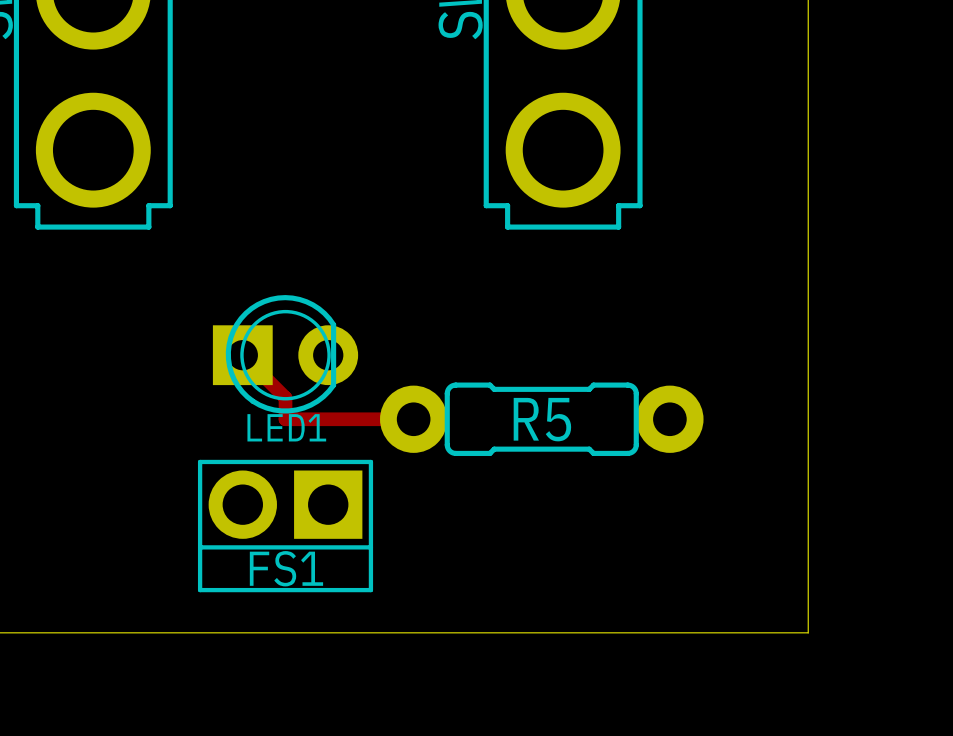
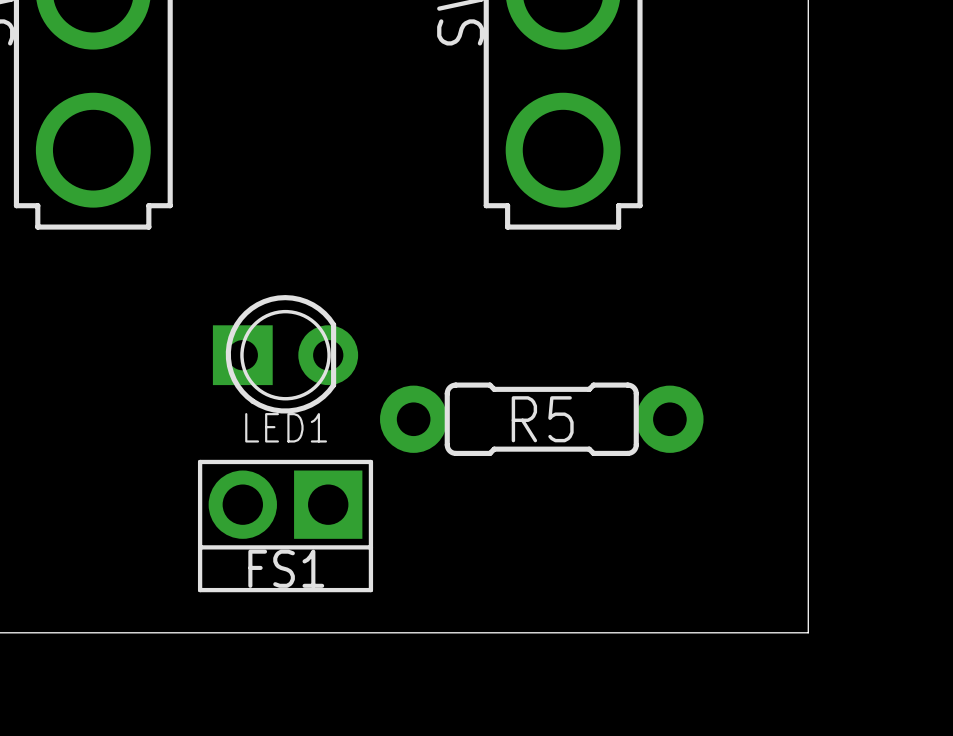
track: (242, 355) (285, 397) (285, 419) (413, 419) -> none

